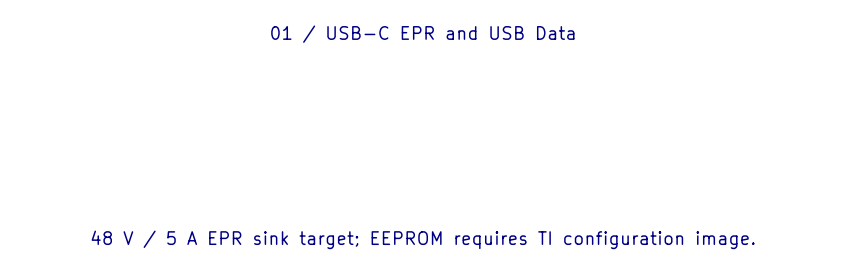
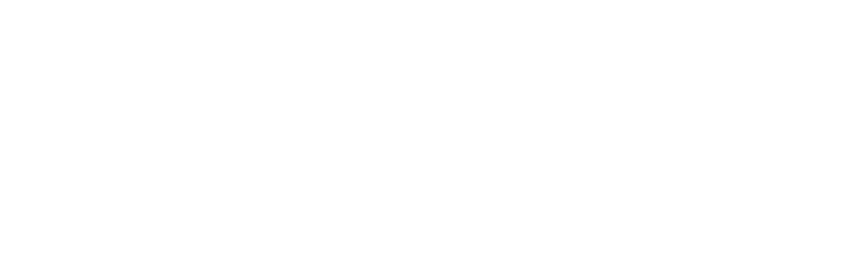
text: 01 / USB-C EPR and USB Data (422, 34) -> none
text: 48 V / 5 A EPR sink target; EEPROM requires TI configuration image. (423, 239) -> none

